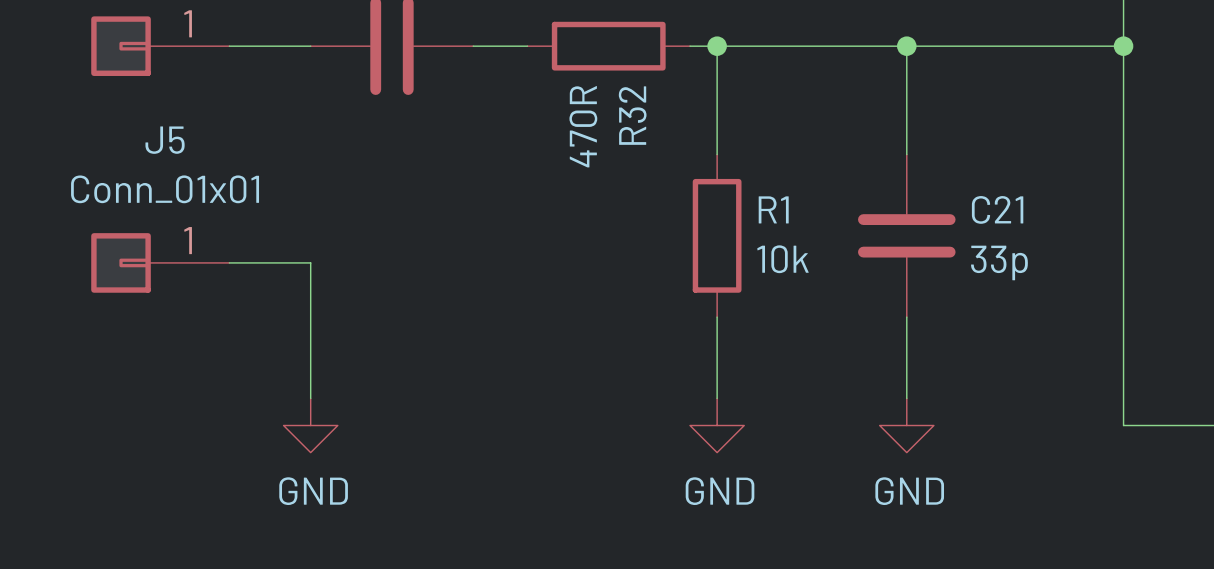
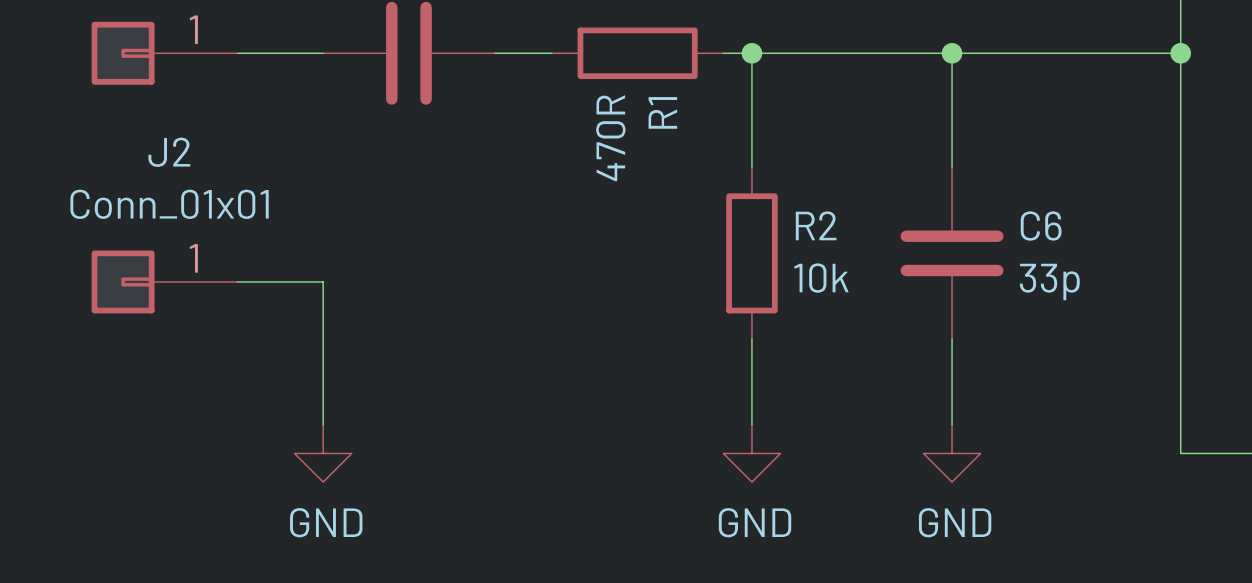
R32 name: R32 (632, 115) -> R1 (662, 112)
J5 name: J5 (165, 140) -> J2 (169, 152)
R1 name: R1 (773, 209) -> R2 (816, 225)
C21 name: C21 (997, 209) -> C6 (1041, 226)

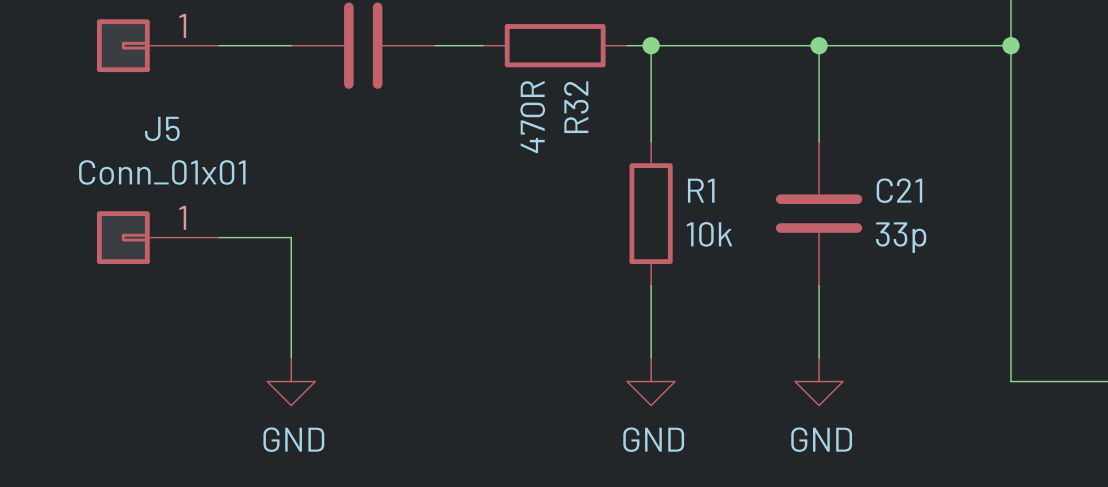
R1 name: R1 (662, 112) -> R32 (576, 107)
J2 name: J2 (169, 152) -> J5 (162, 128)
R2 name: R2 (816, 225) -> R1 (701, 190)
C6 name: C6 (1041, 226) -> C21 (899, 190)

